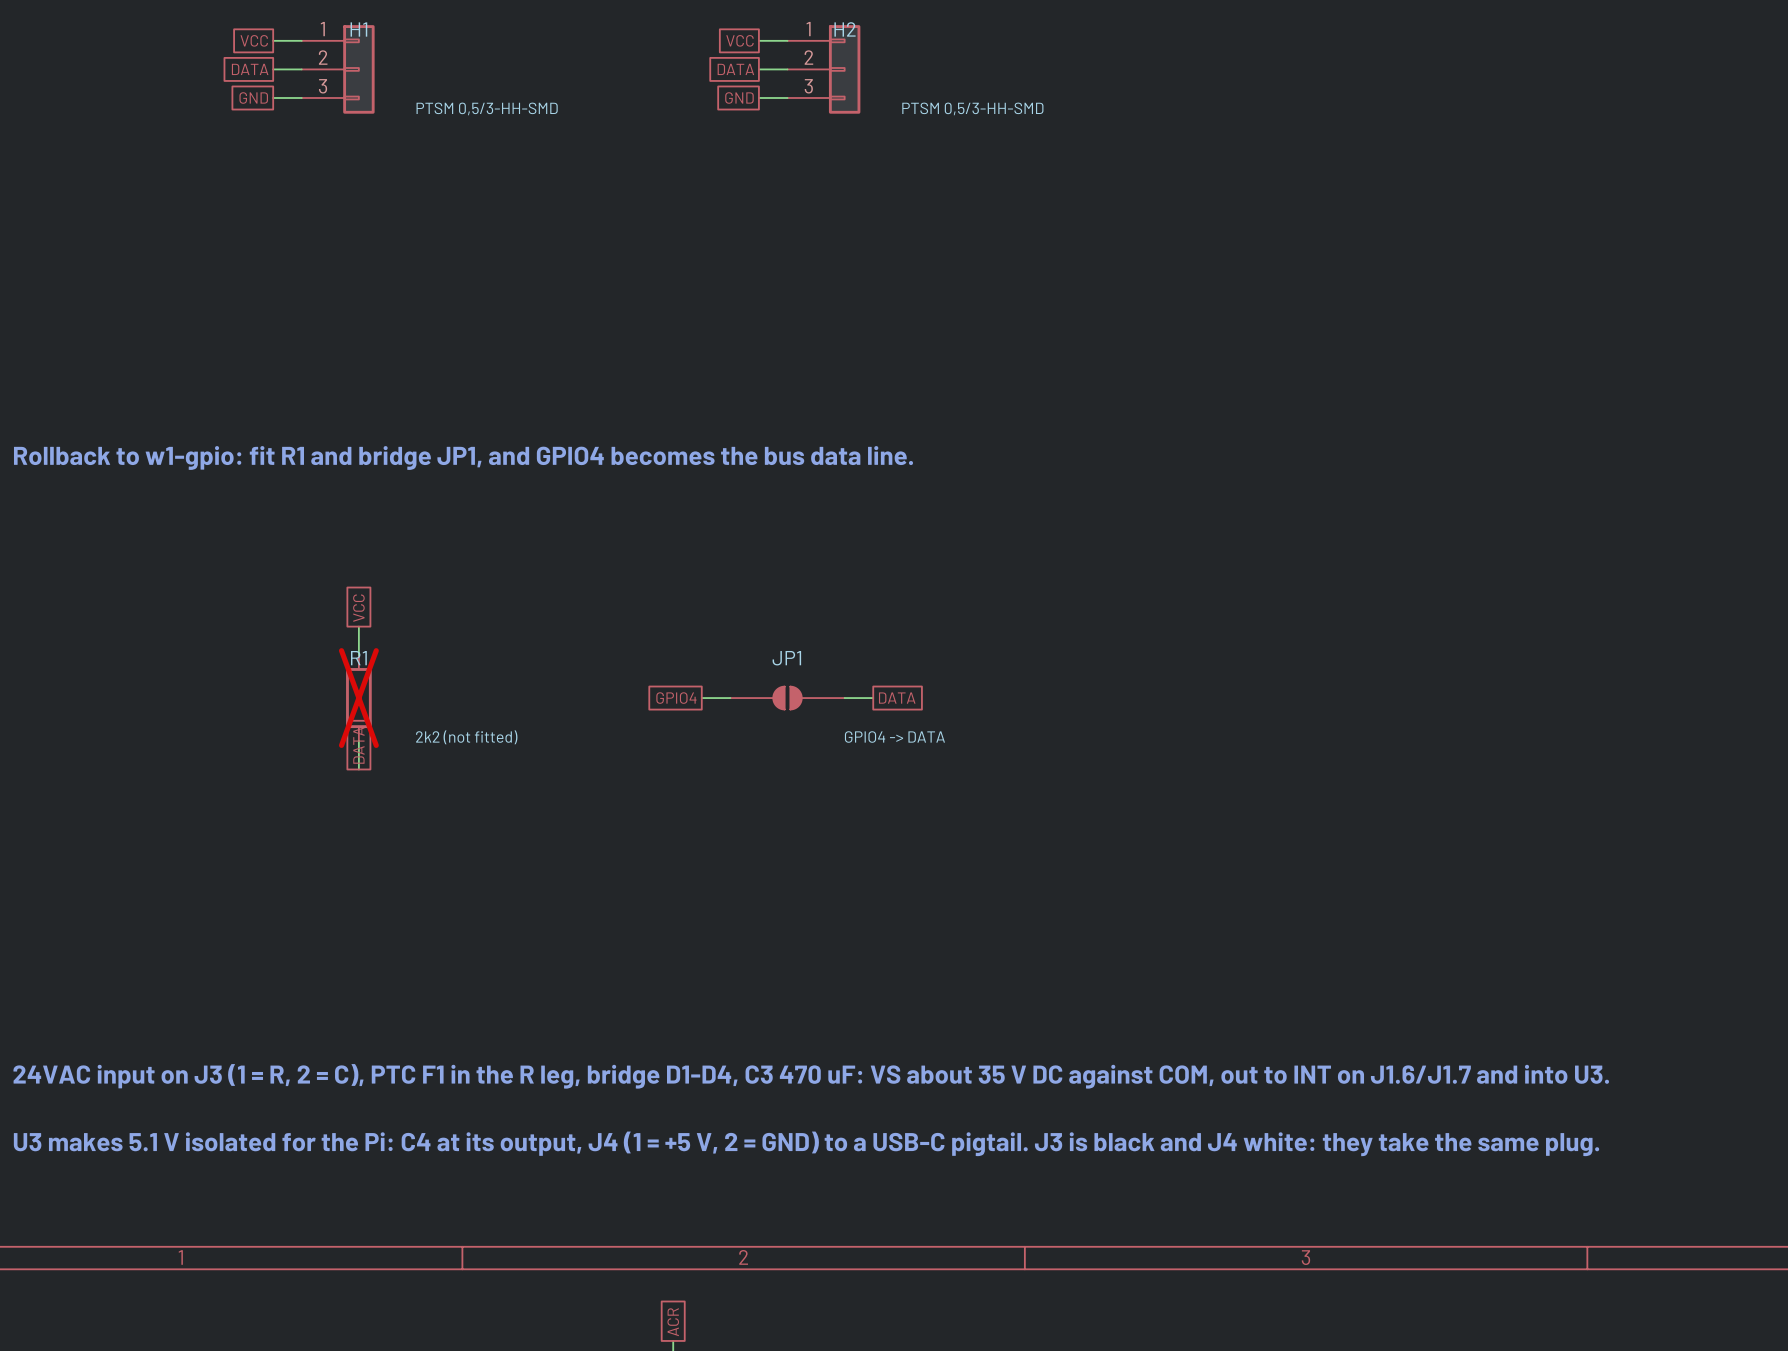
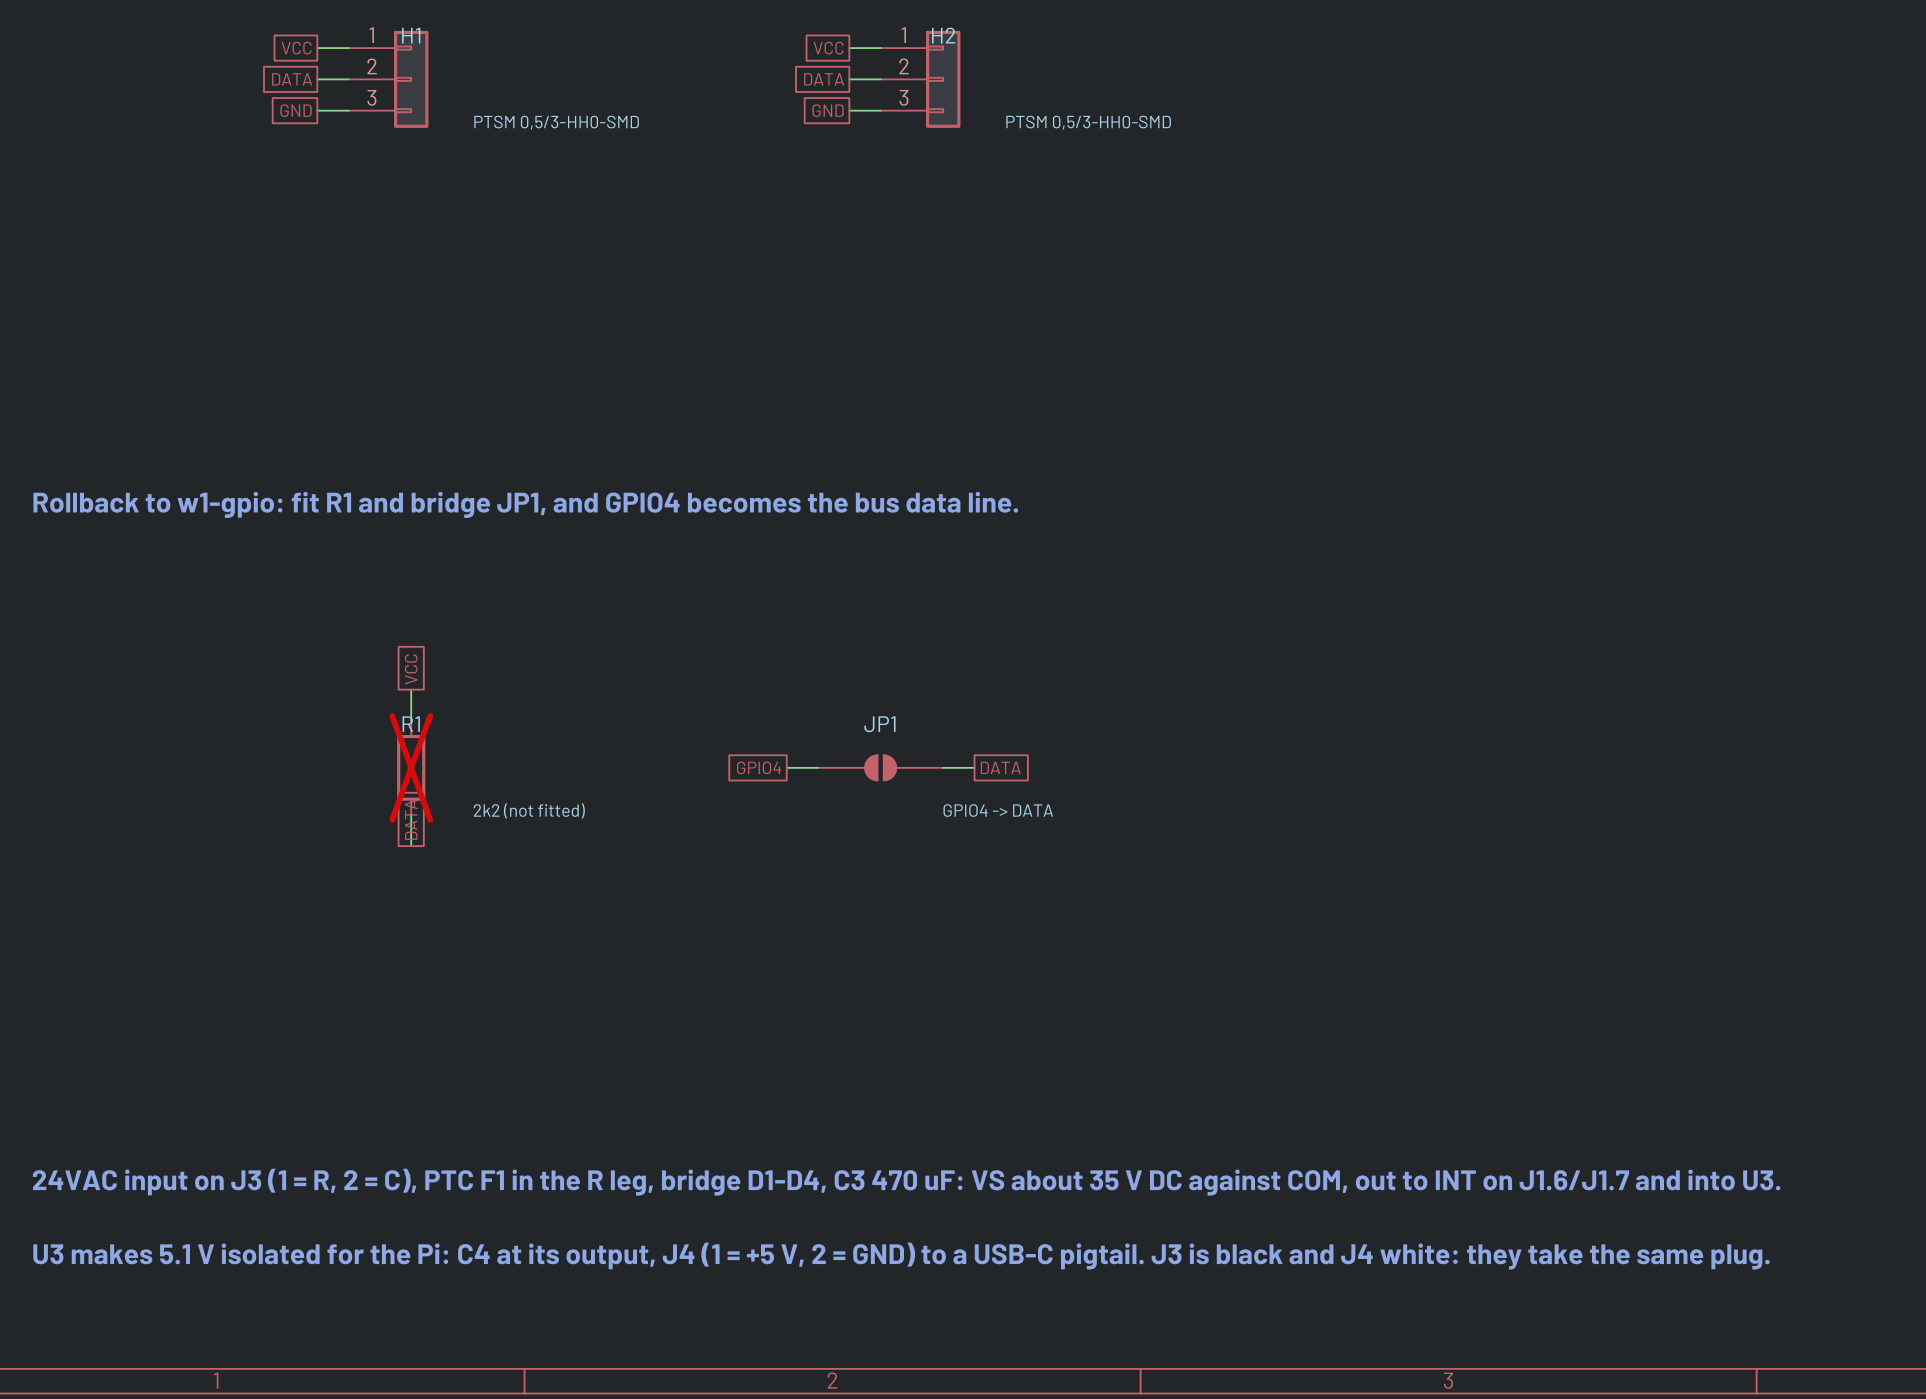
H1 value: PTSM 0,5/3-HH-SMD (487, 108) -> PTSM 0,5/3-HH0-SMD (556, 122)
H2 value: PTSM 0,5/3-HH-SMD (972, 108) -> PTSM 0,5/3-HH0-SMD (1088, 122)

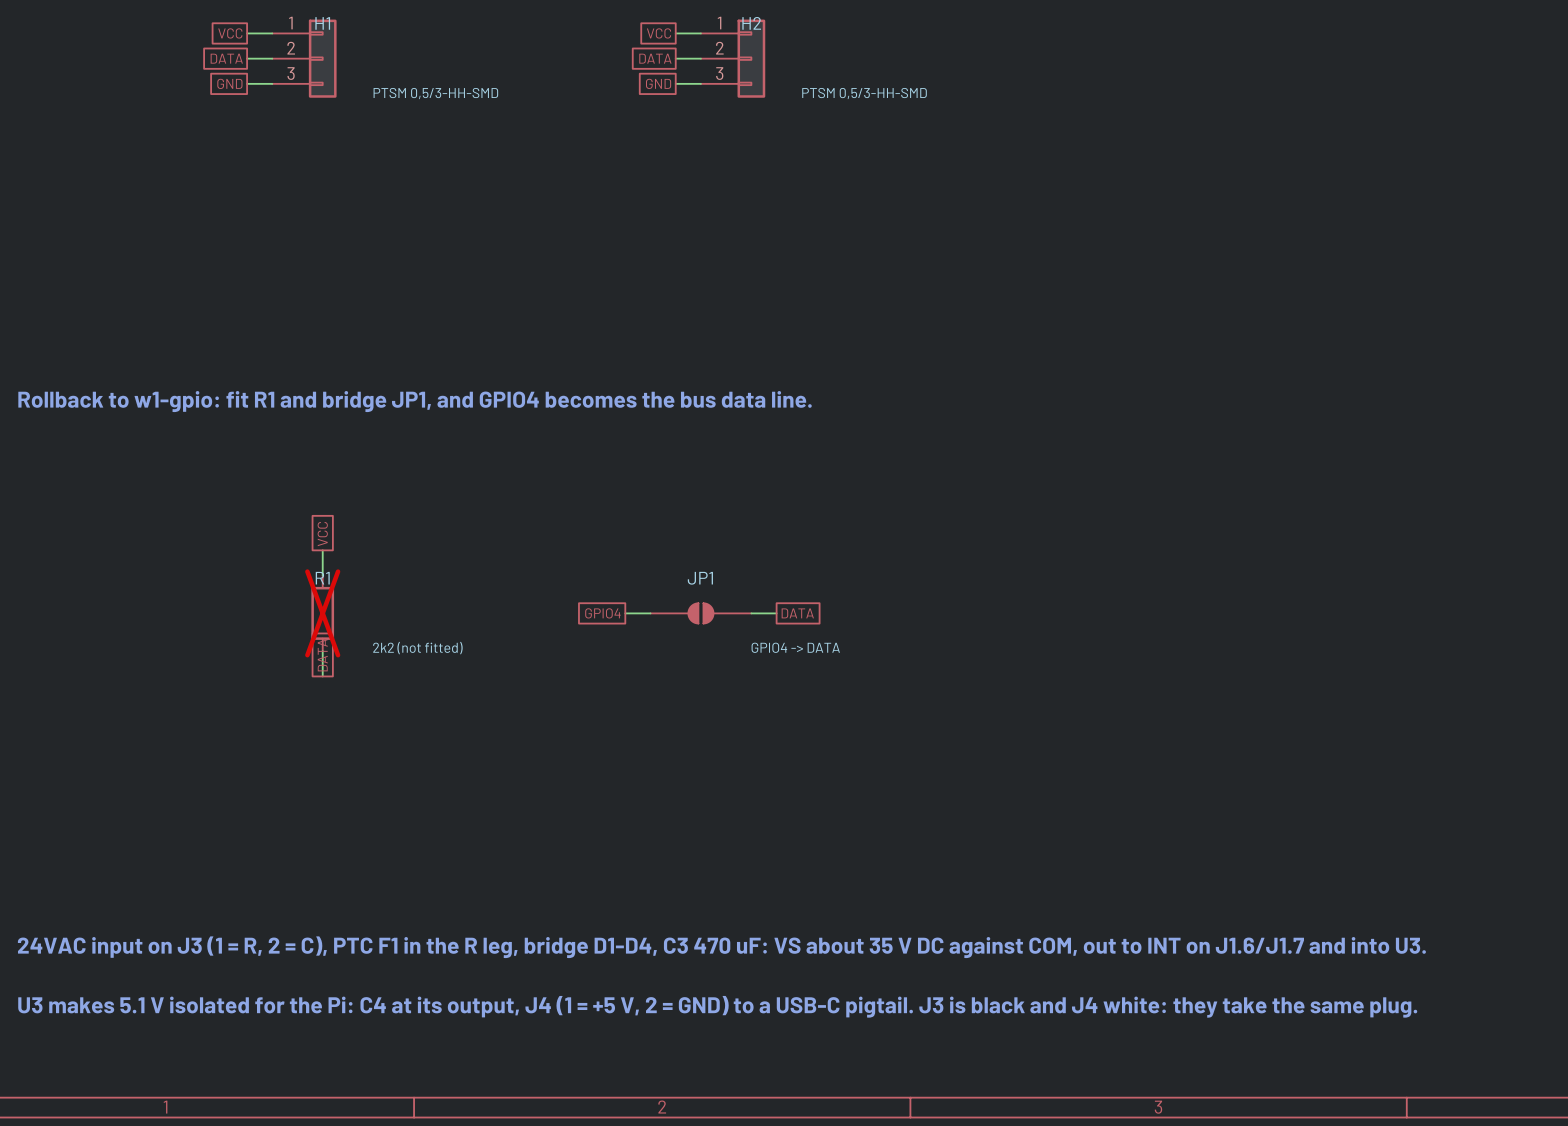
H1 value: PTSM 0,5/3-HH0-SMD (556, 122) -> PTSM 0,5/3-HH-SMD (435, 93)
H2 value: PTSM 0,5/3-HH0-SMD (1088, 122) -> PTSM 0,5/3-HH-SMD (864, 93)

